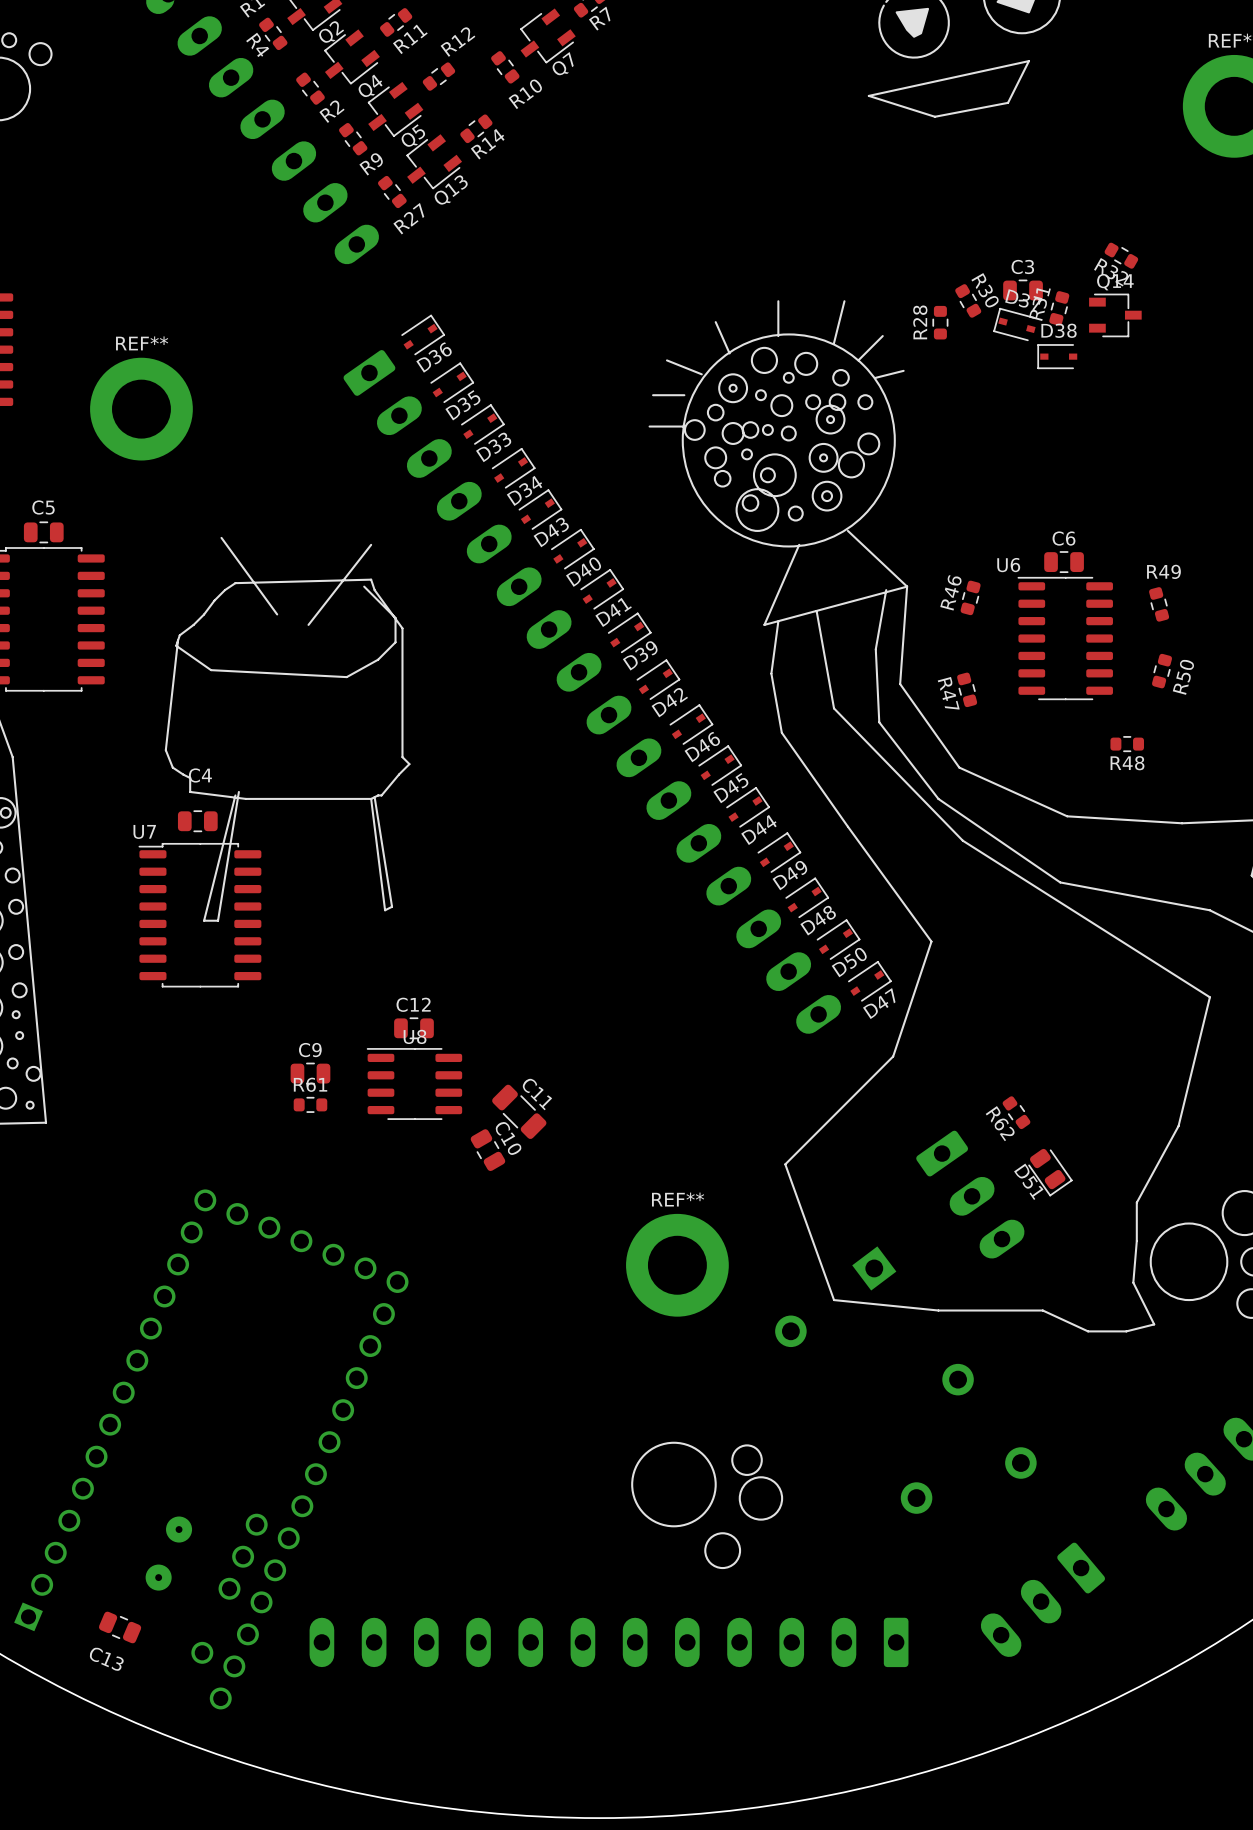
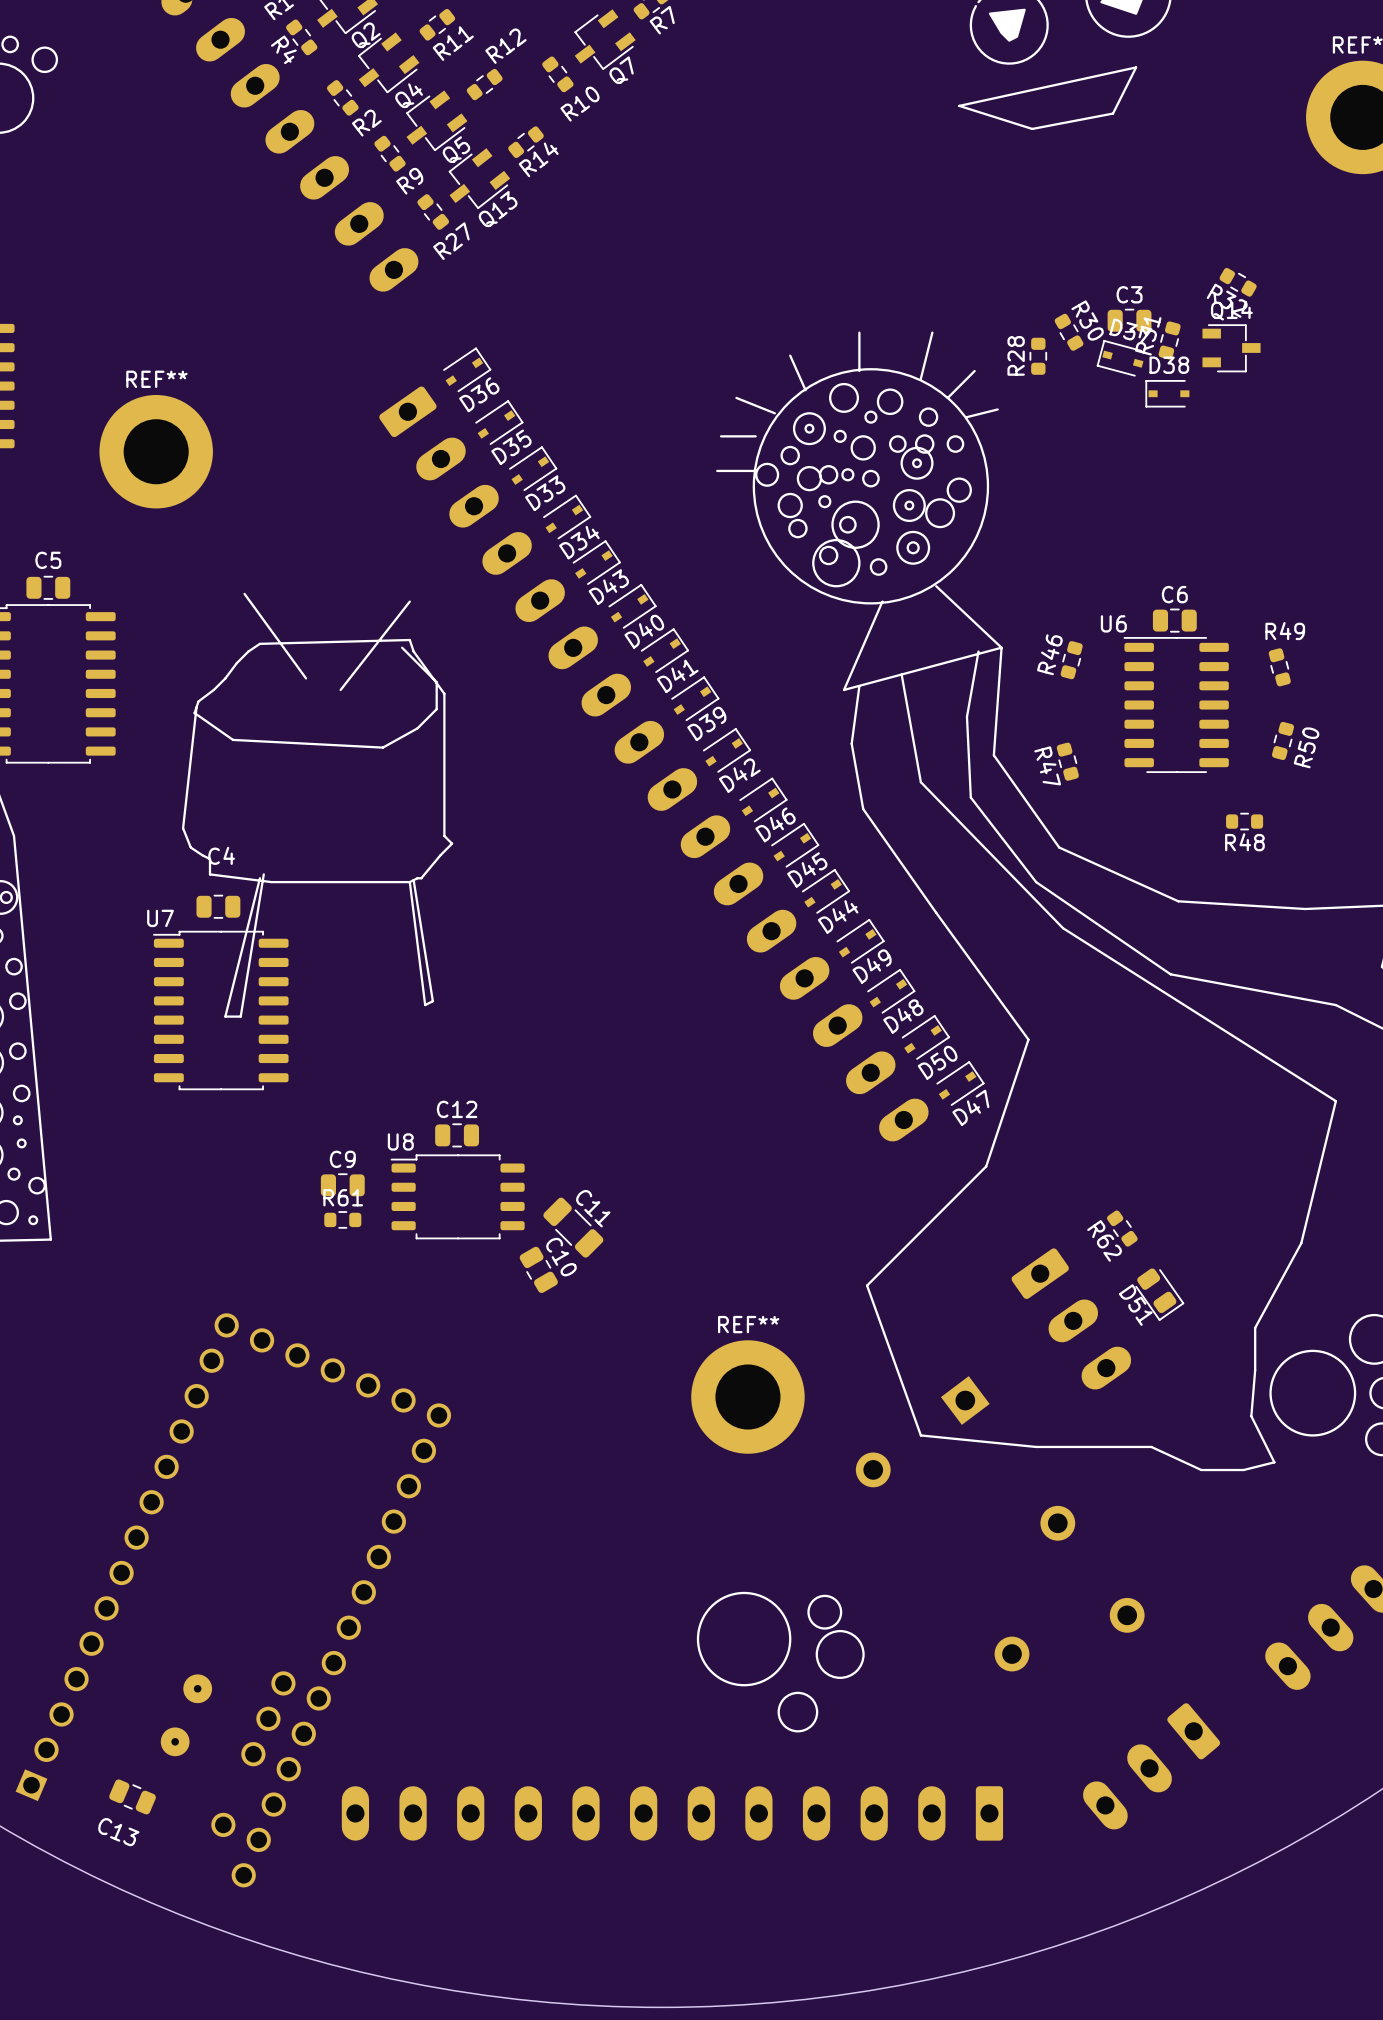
U8 name position: U8 (415, 1036) -> U8 (400, 1141)
U8 footprint: [366, 1048, 463, 1120] -> [390, 1154, 525, 1240]

